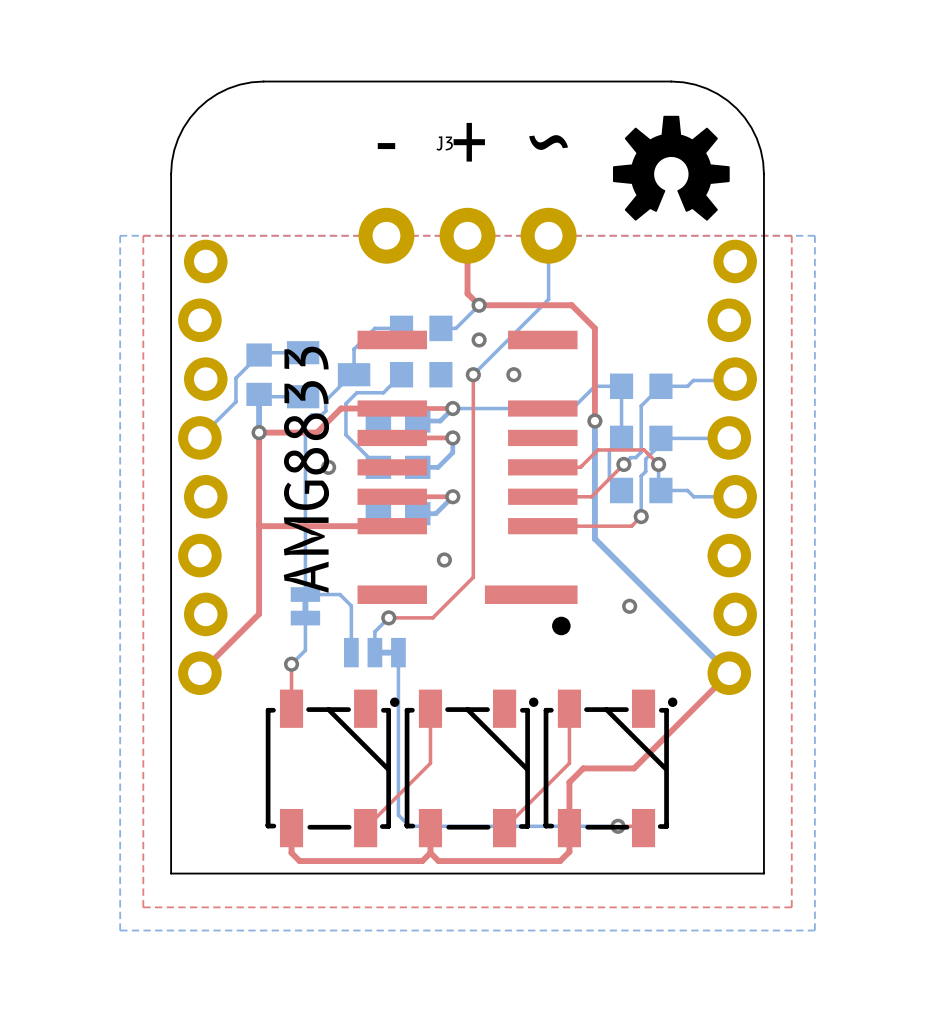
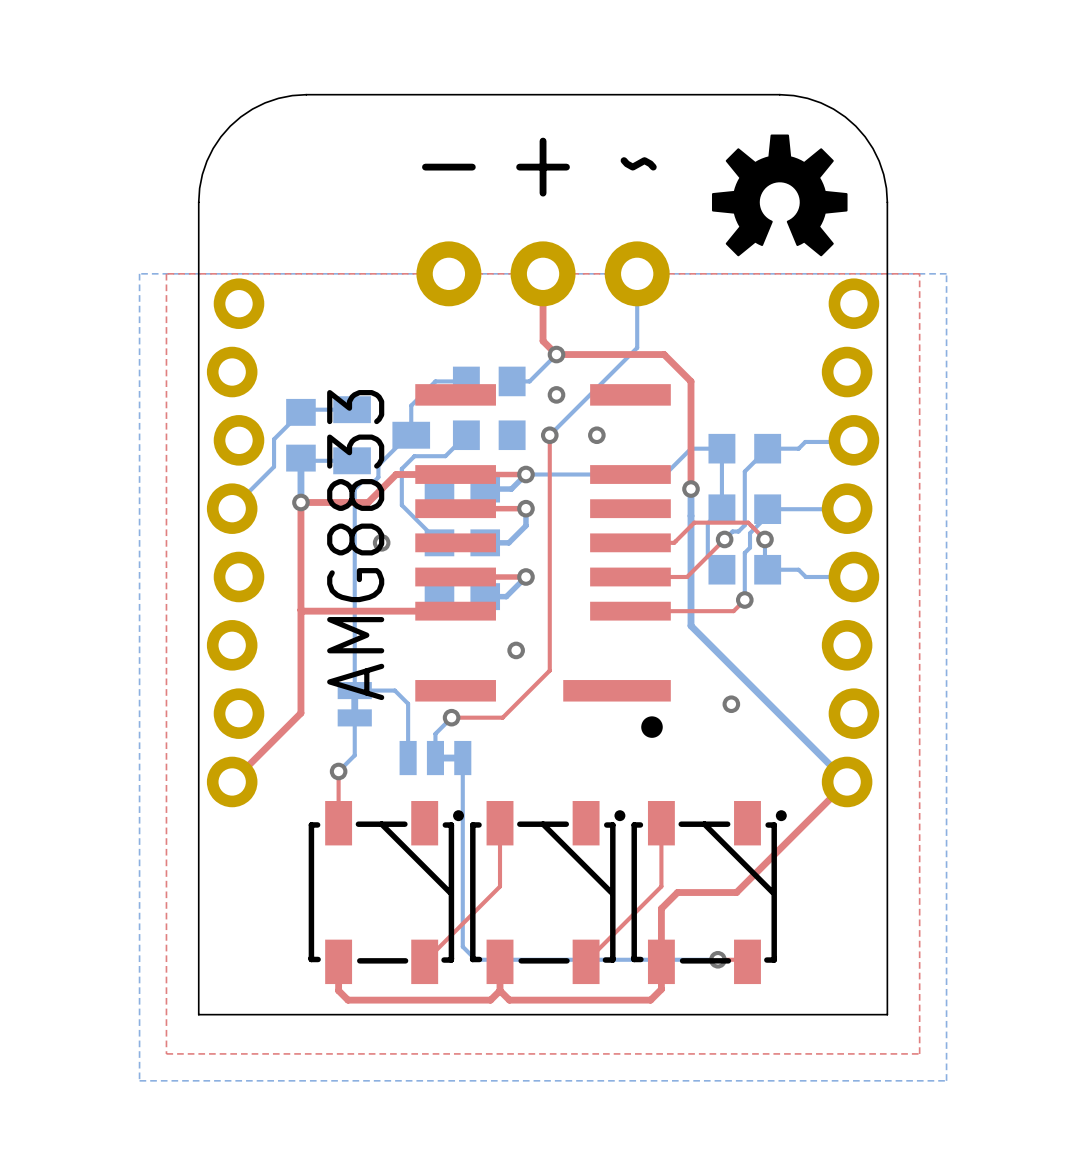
J3 name: J3 (444, 143) -> none

